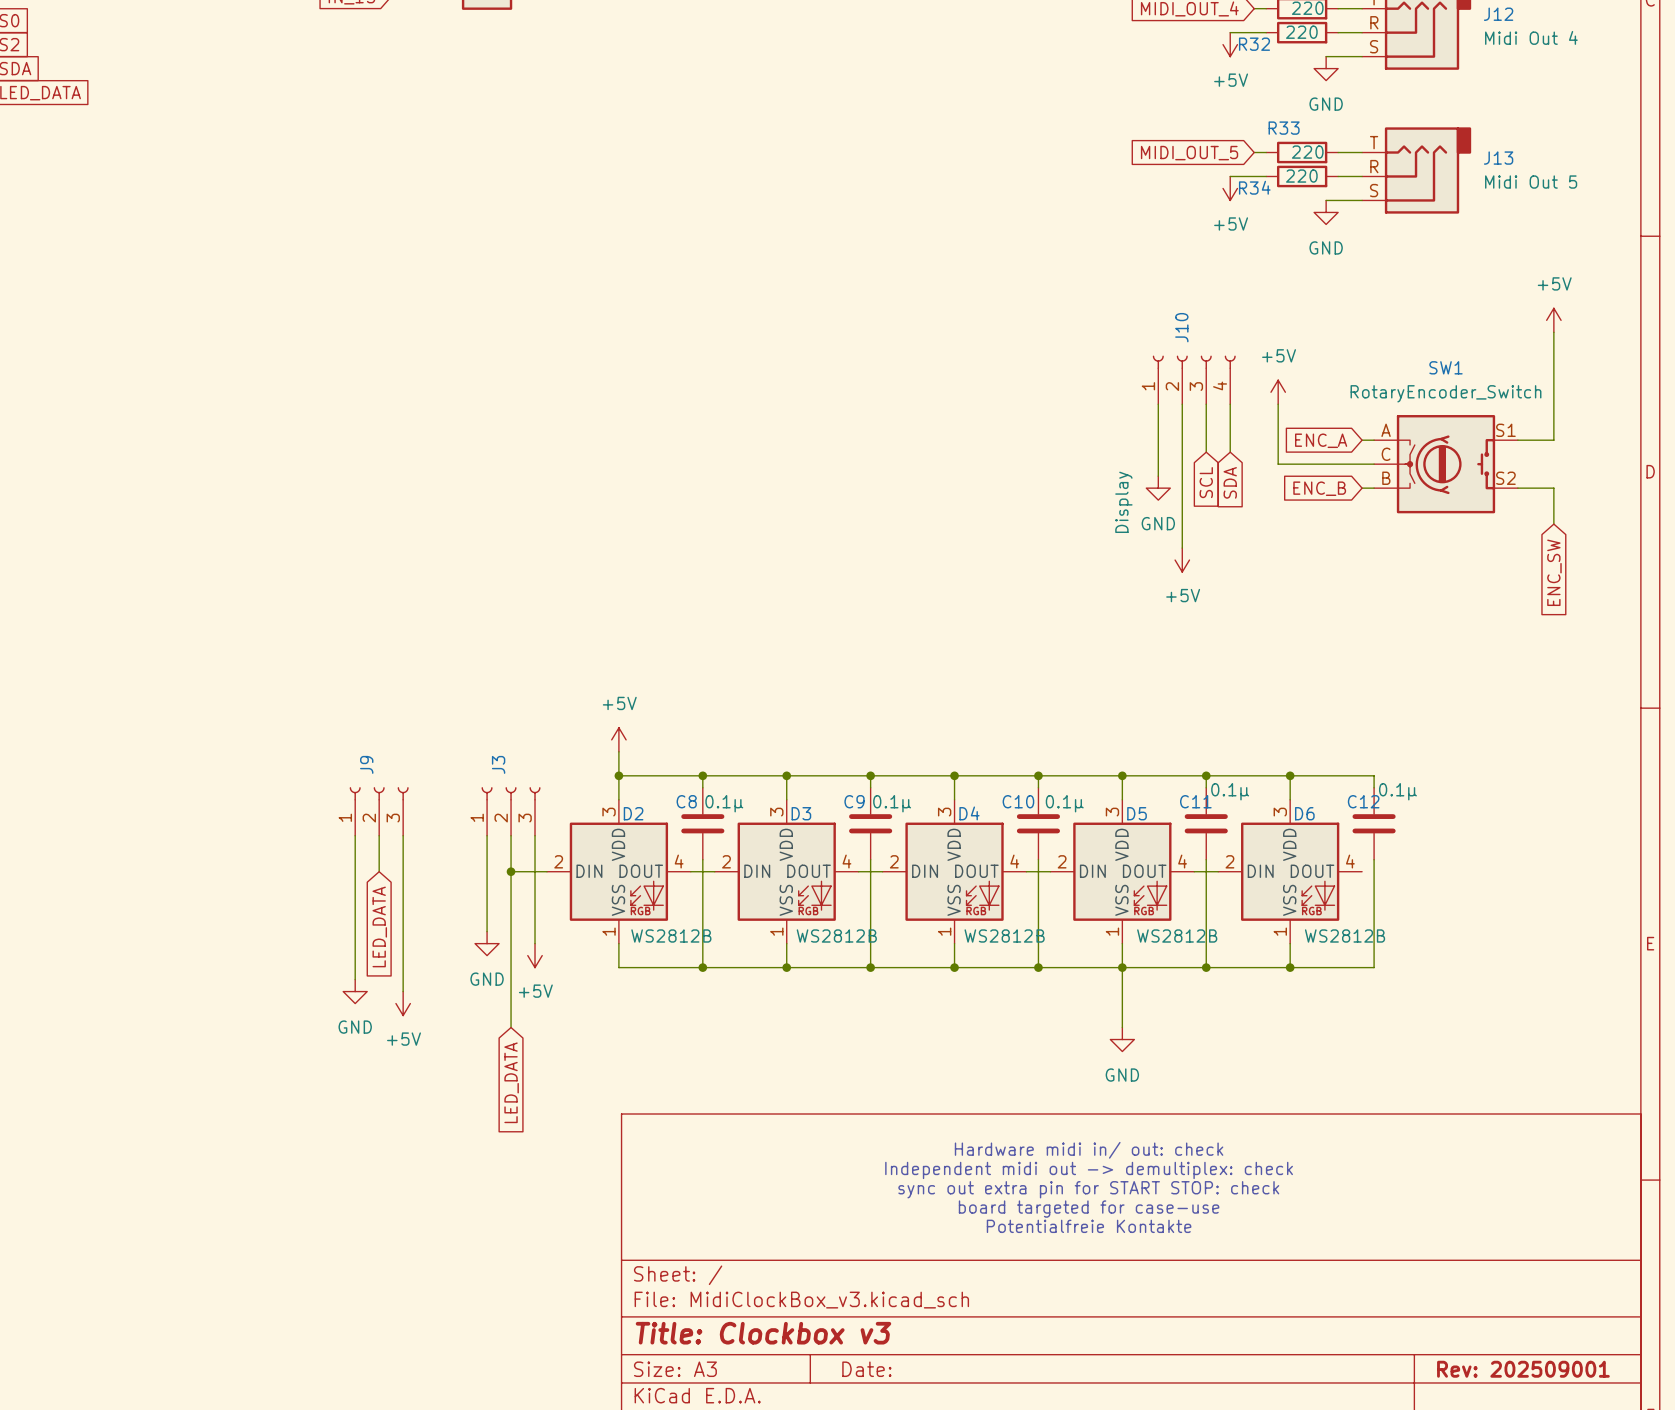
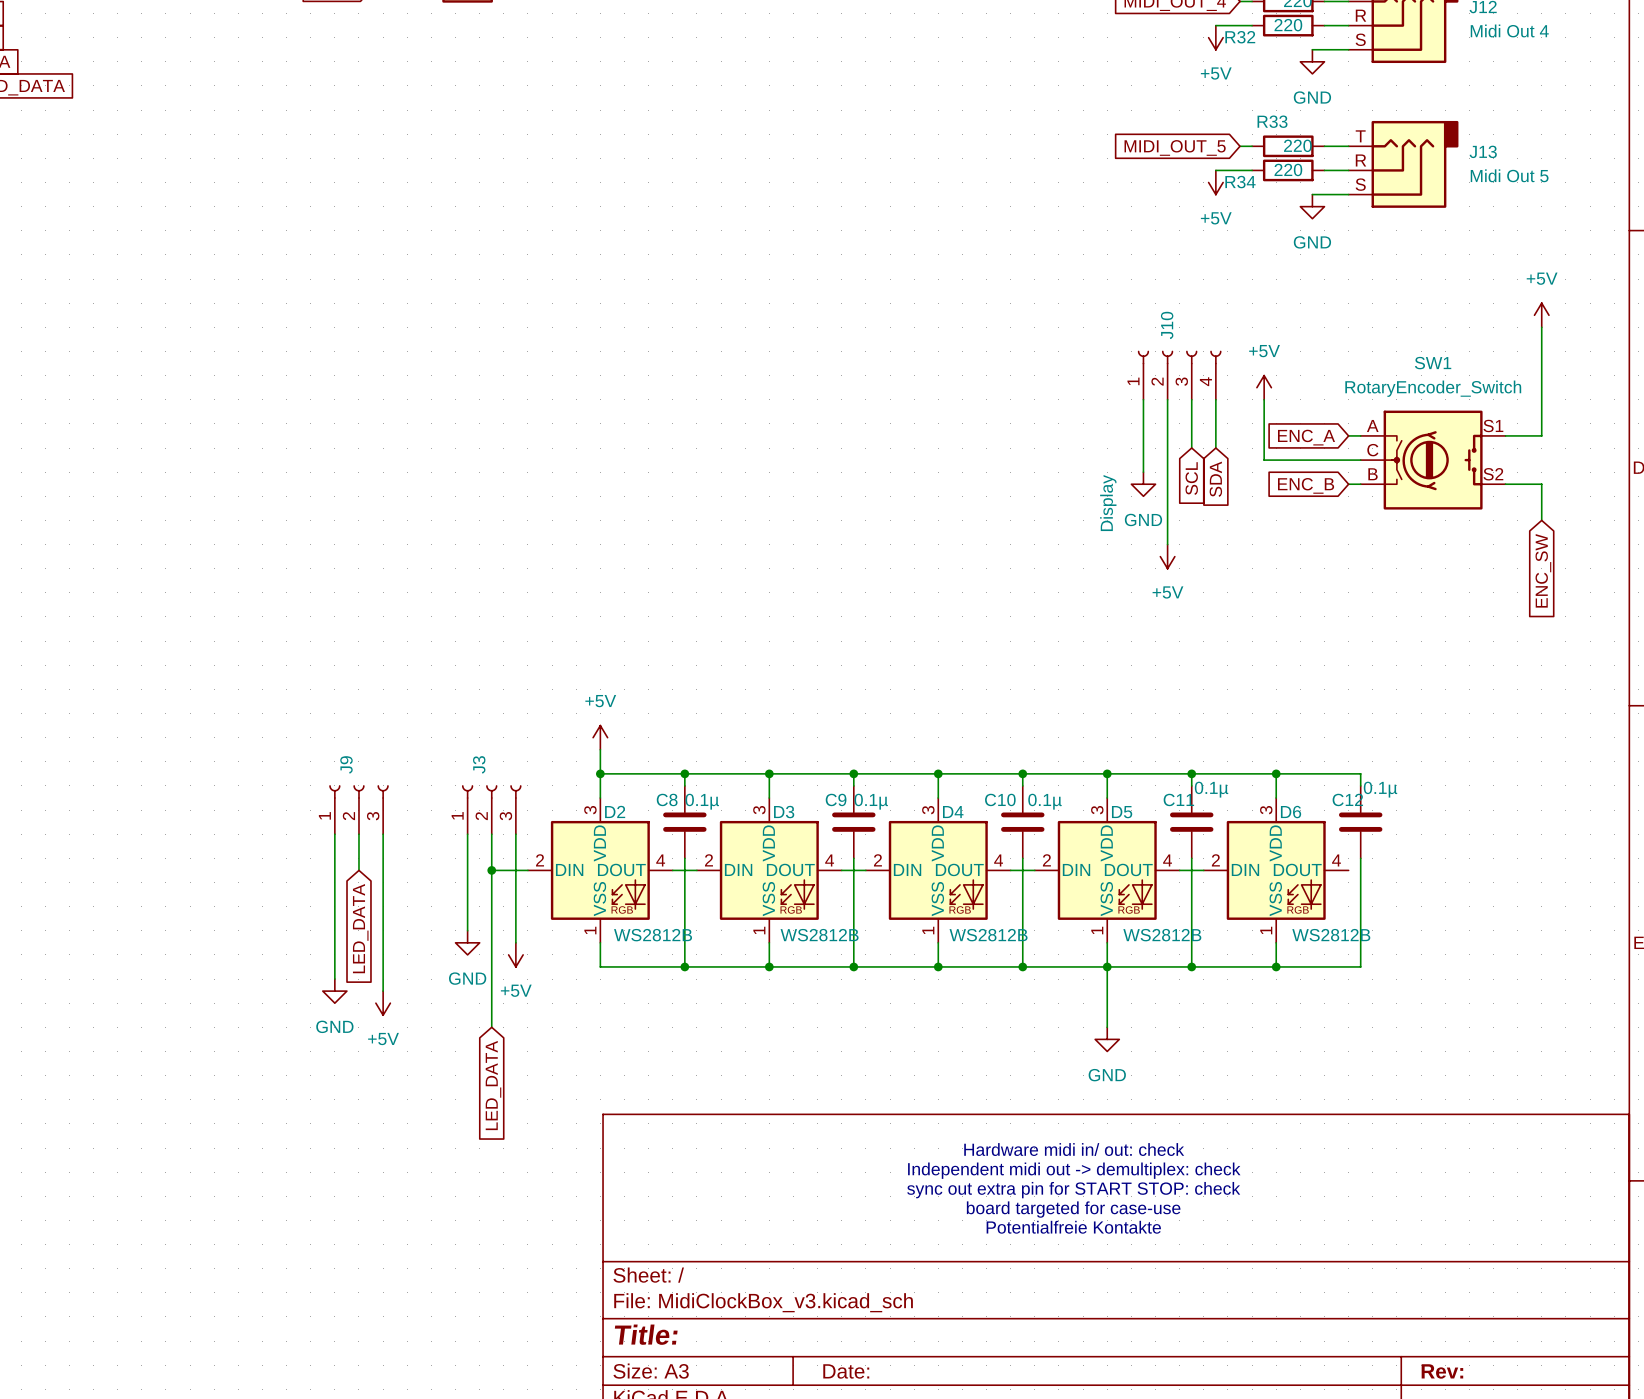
title block: Title: Clockbox v3 (763, 1333) -> Title: (646, 1334)
title block: Rev: 202509001 (1523, 1369) -> Rev: (1442, 1371)

